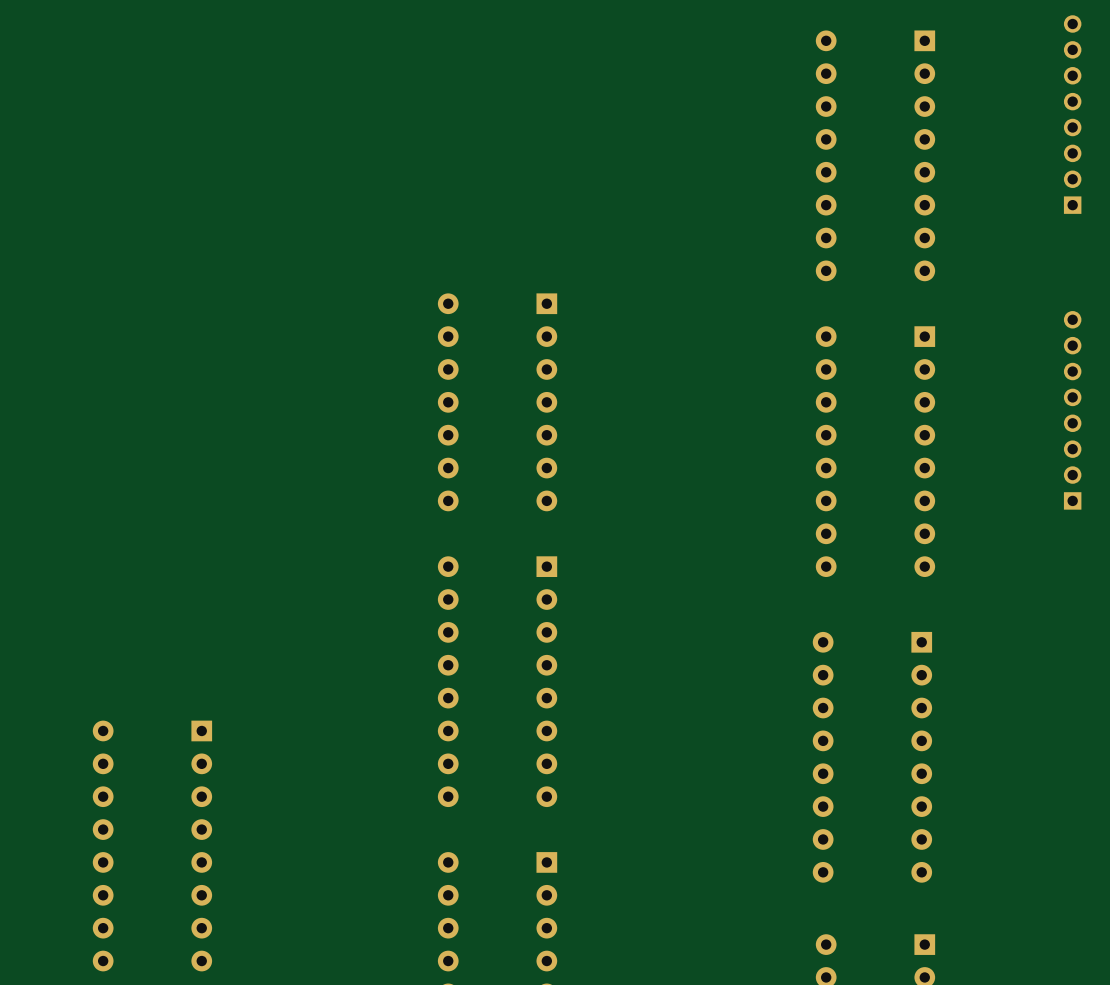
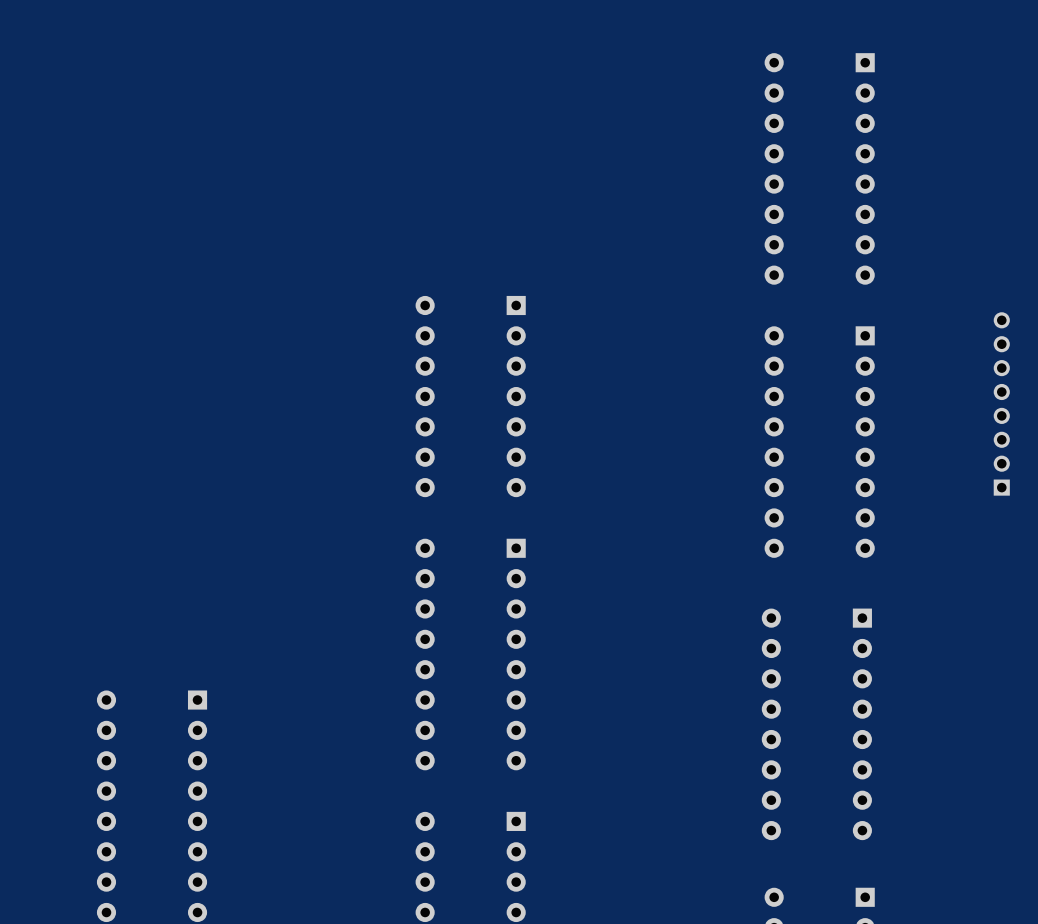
part: (1072, 114) -> none

